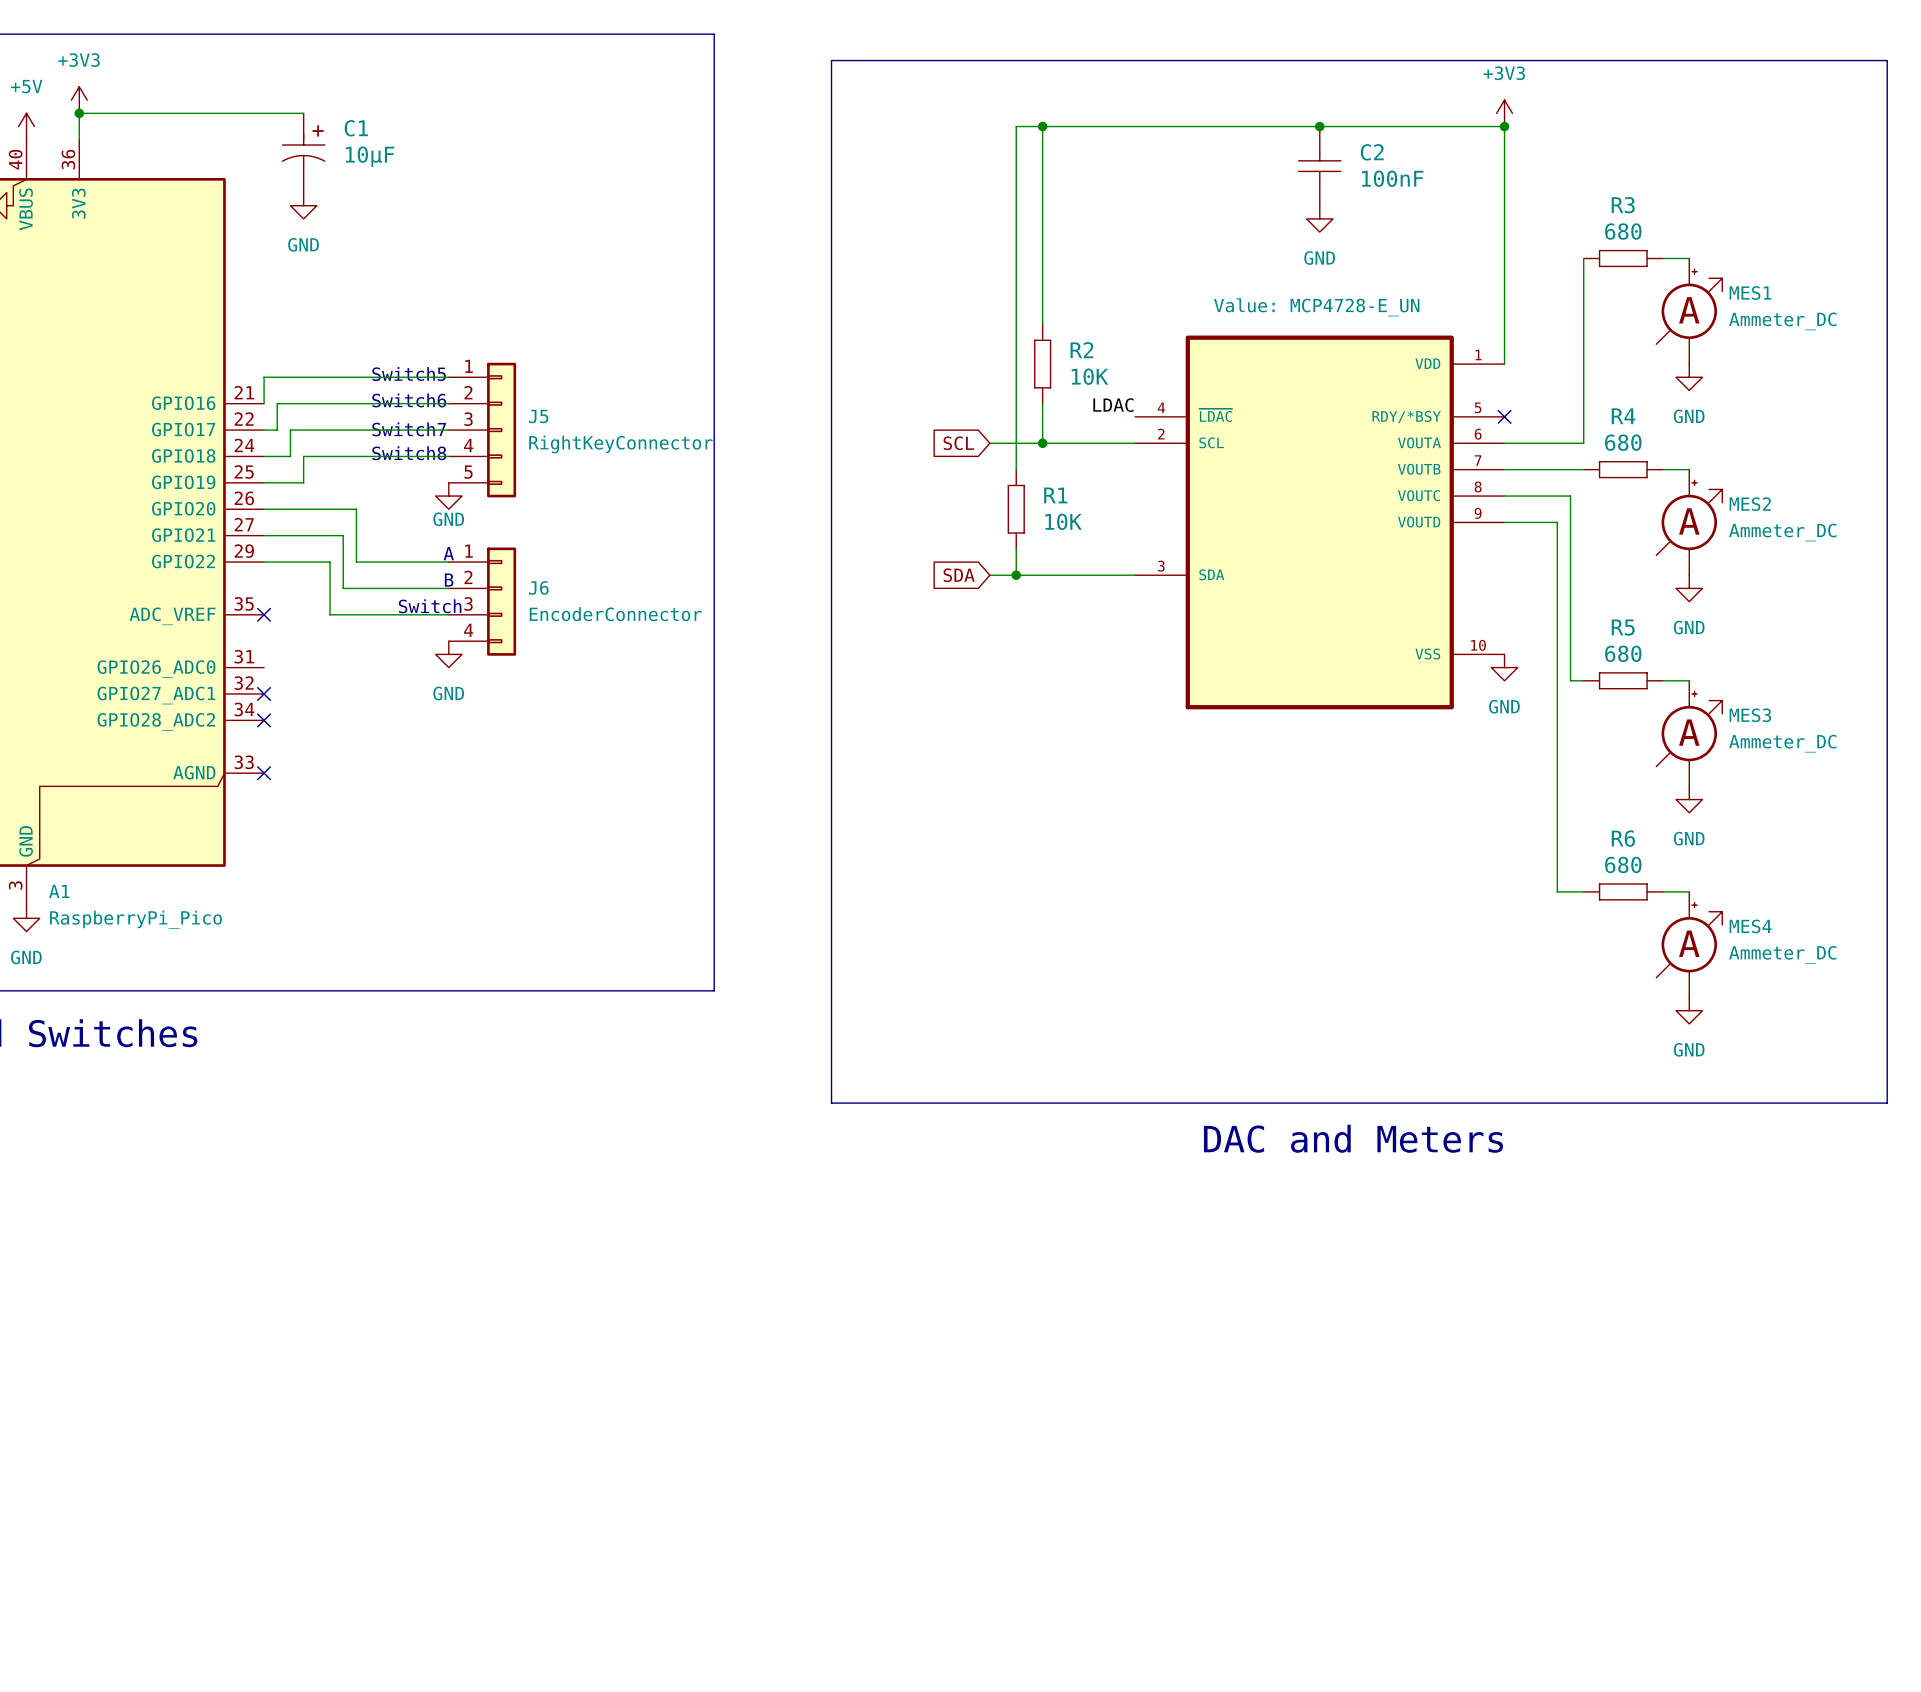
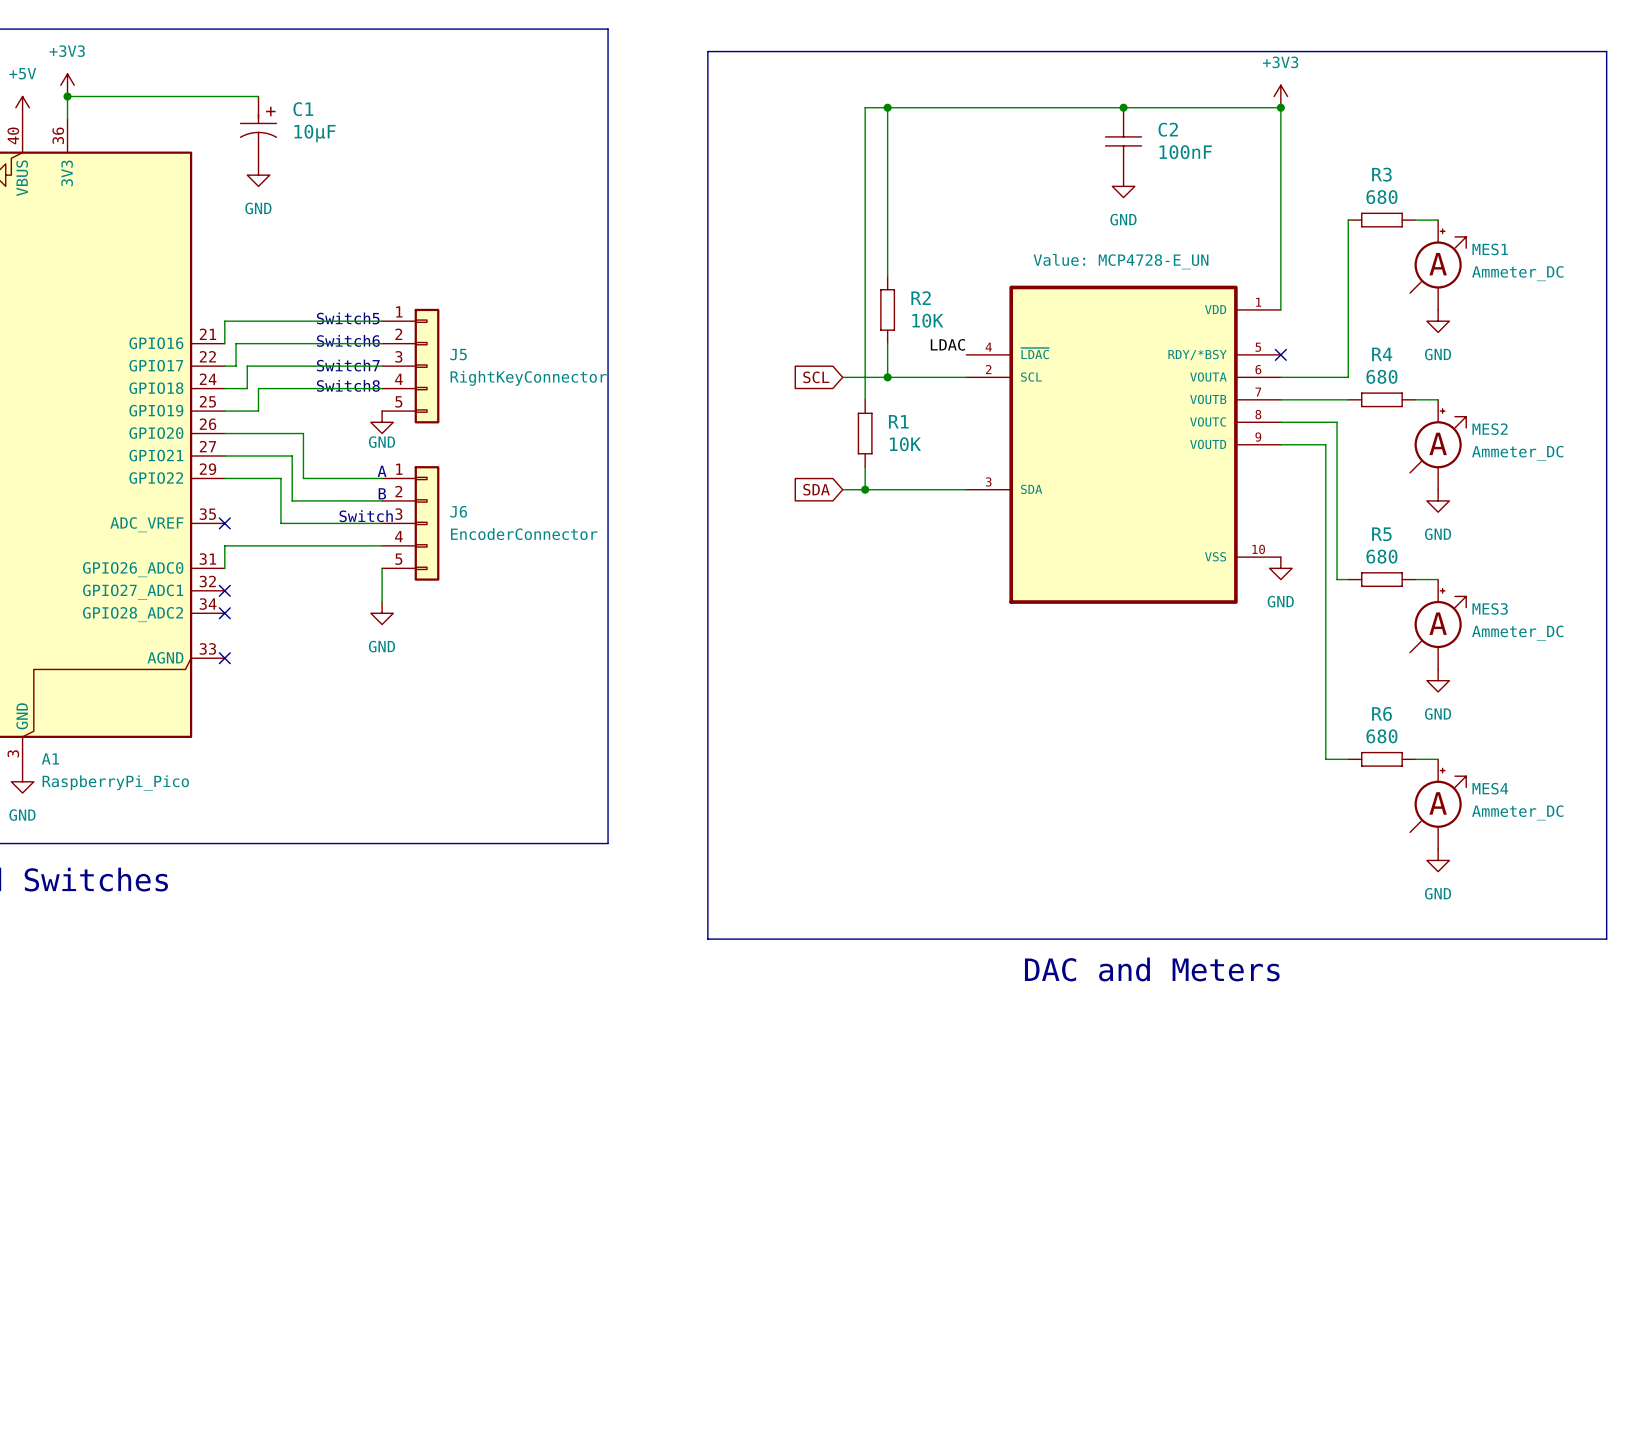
J6 symbol: [448, 547, 517, 656] -> [382, 466, 440, 581]
wire: none -> (382, 545) (224, 545) (224, 568)
power symbol position: GND (448, 654) -> GND (382, 613)
wire: none -> (382, 568) (382, 602)

